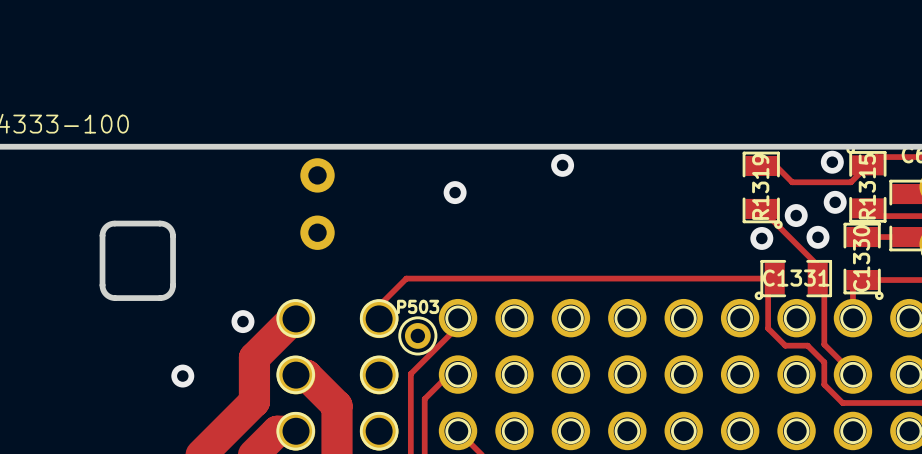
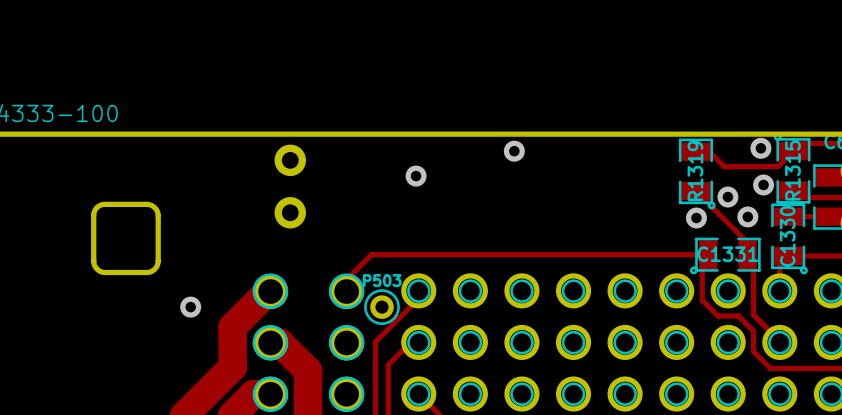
via: (242, 321) -> none
via: none -> (190, 307)
via: (182, 376) -> none

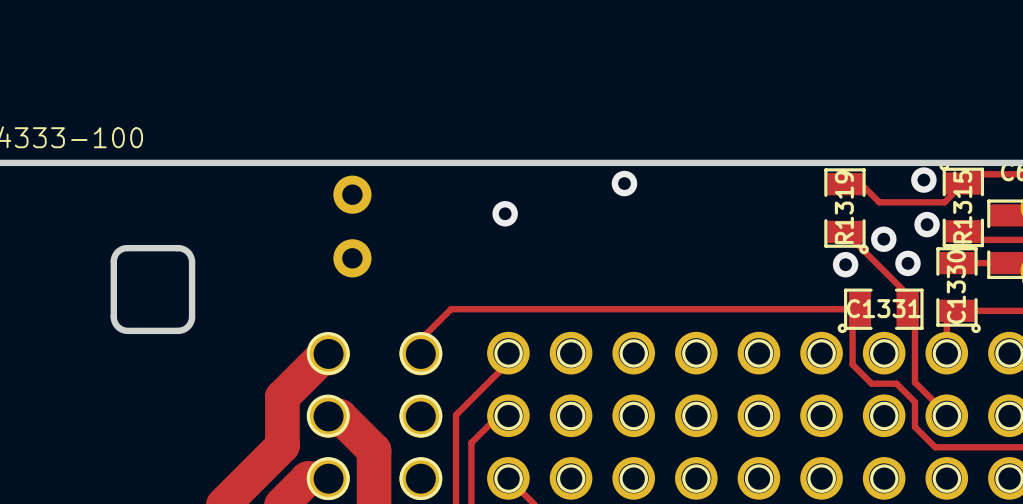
via: (190, 307) -> none
P503: (382, 307) -> none

